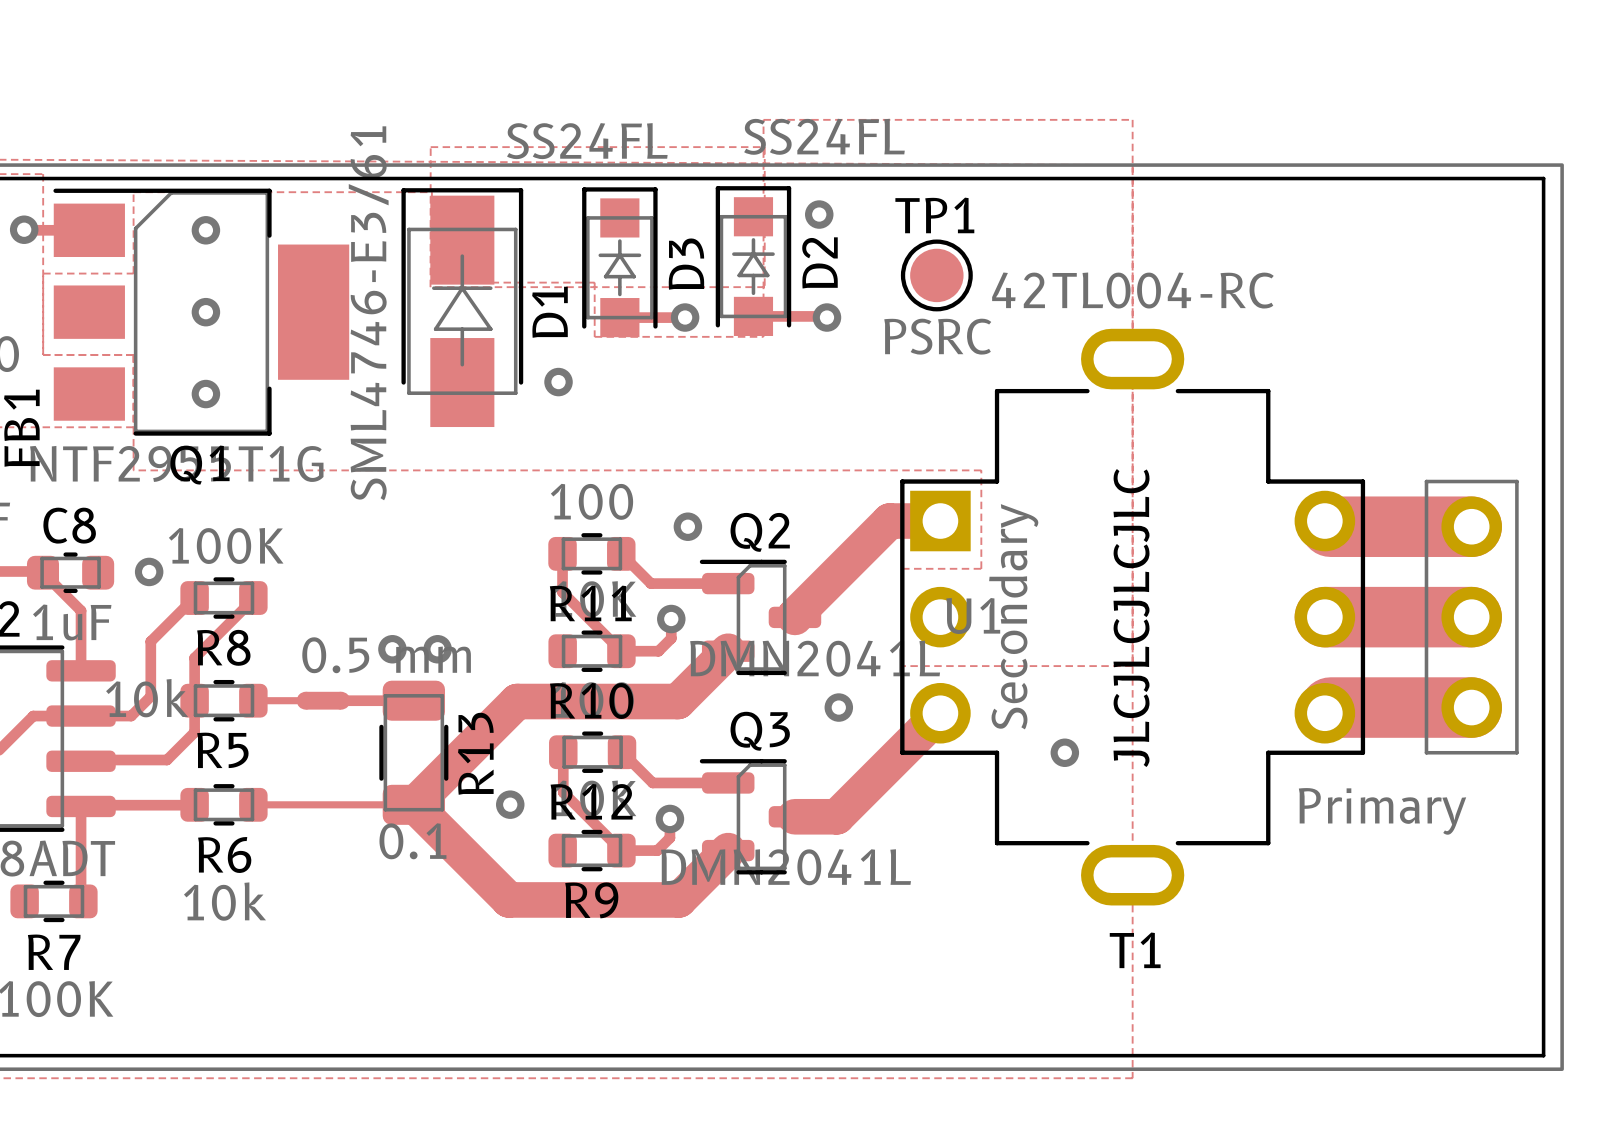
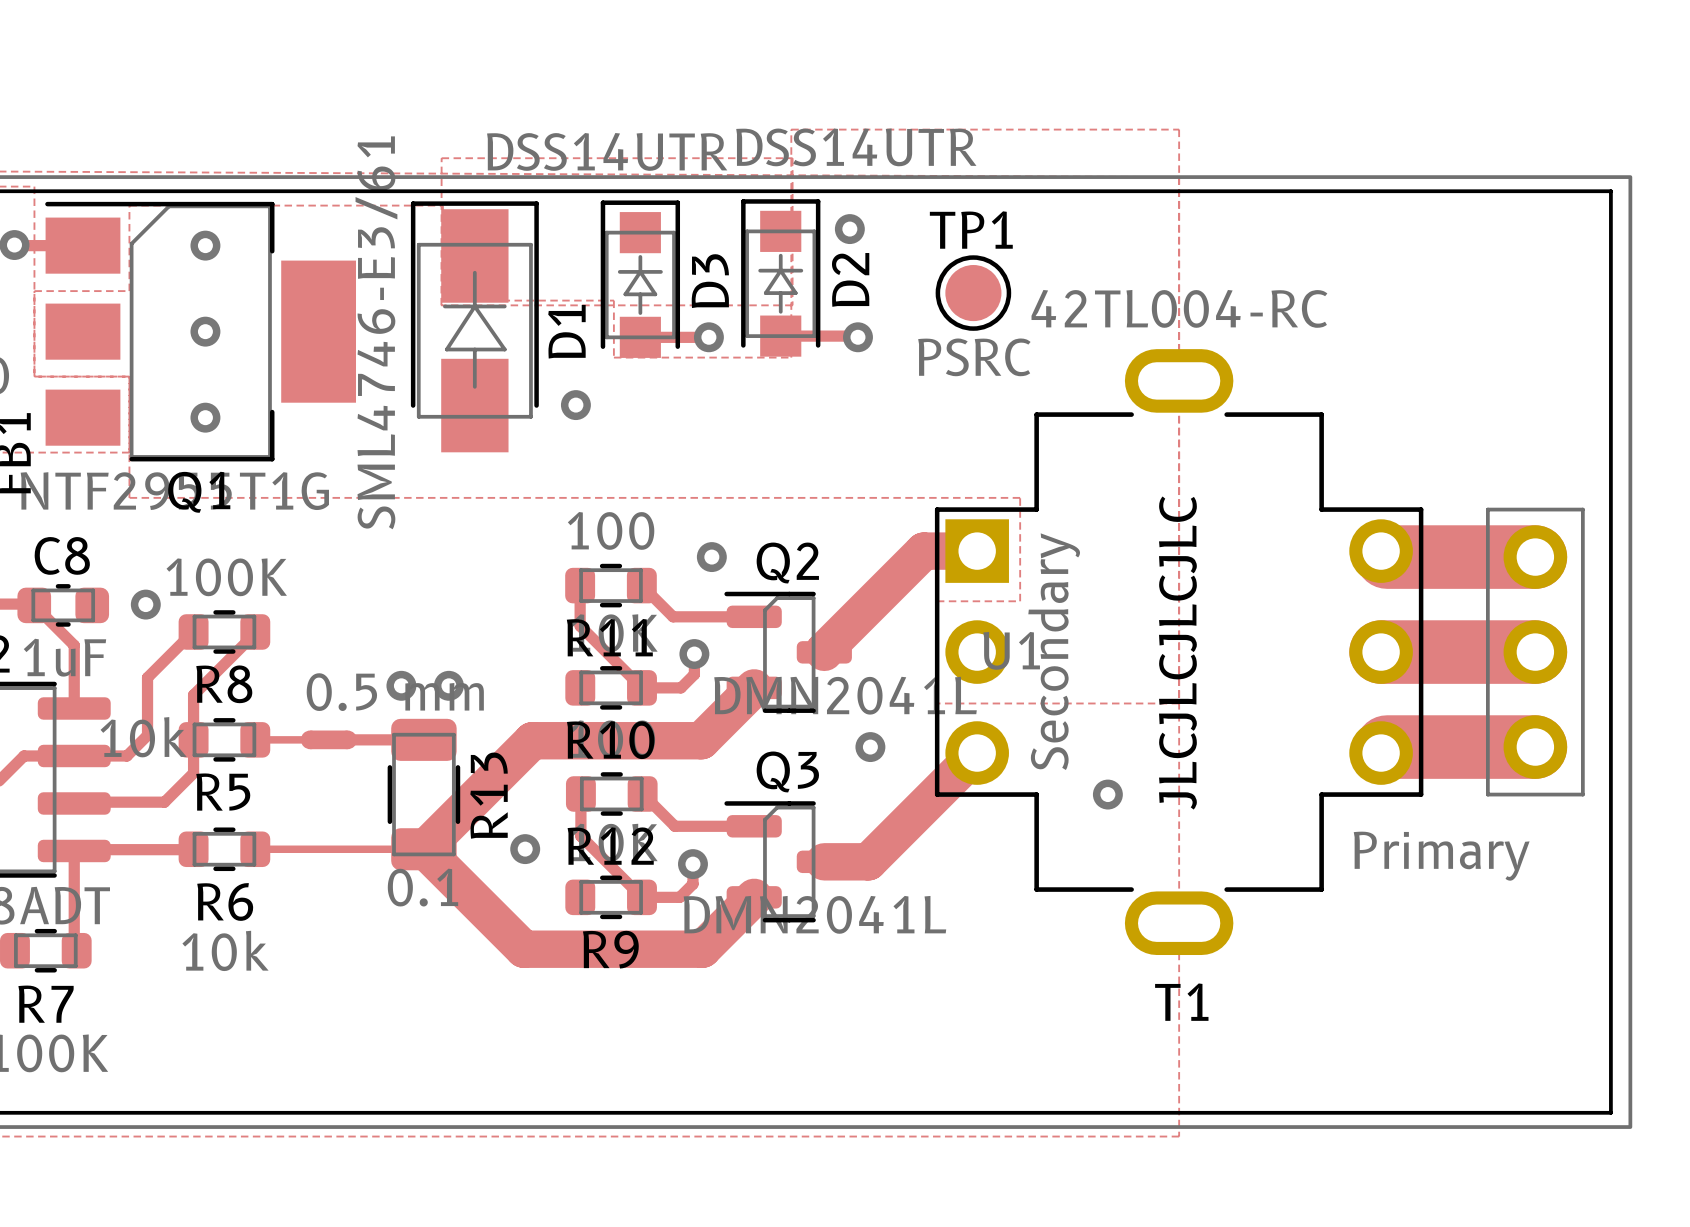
D2 value: SS24FL (824, 136) -> DSS14UTR (856, 147)
D3 value: SS24FL (587, 141) -> DSS14UTR (607, 151)

